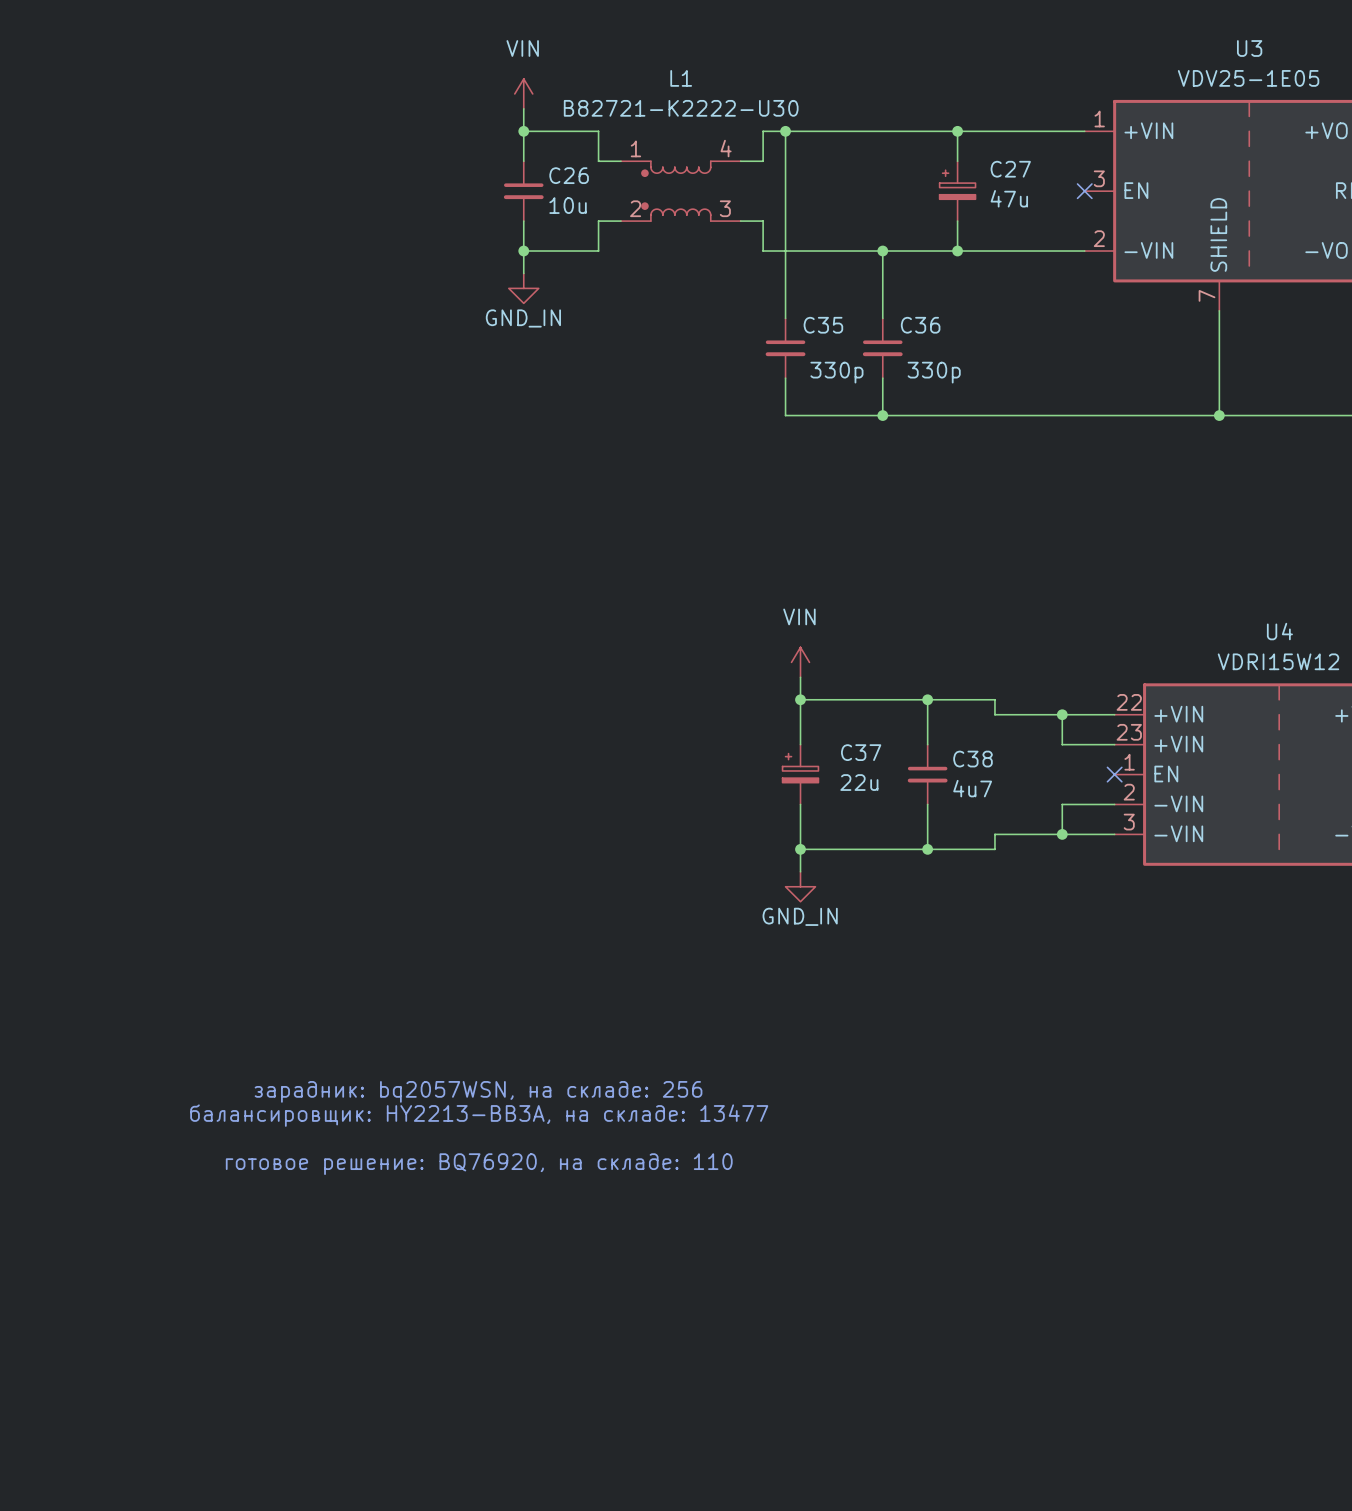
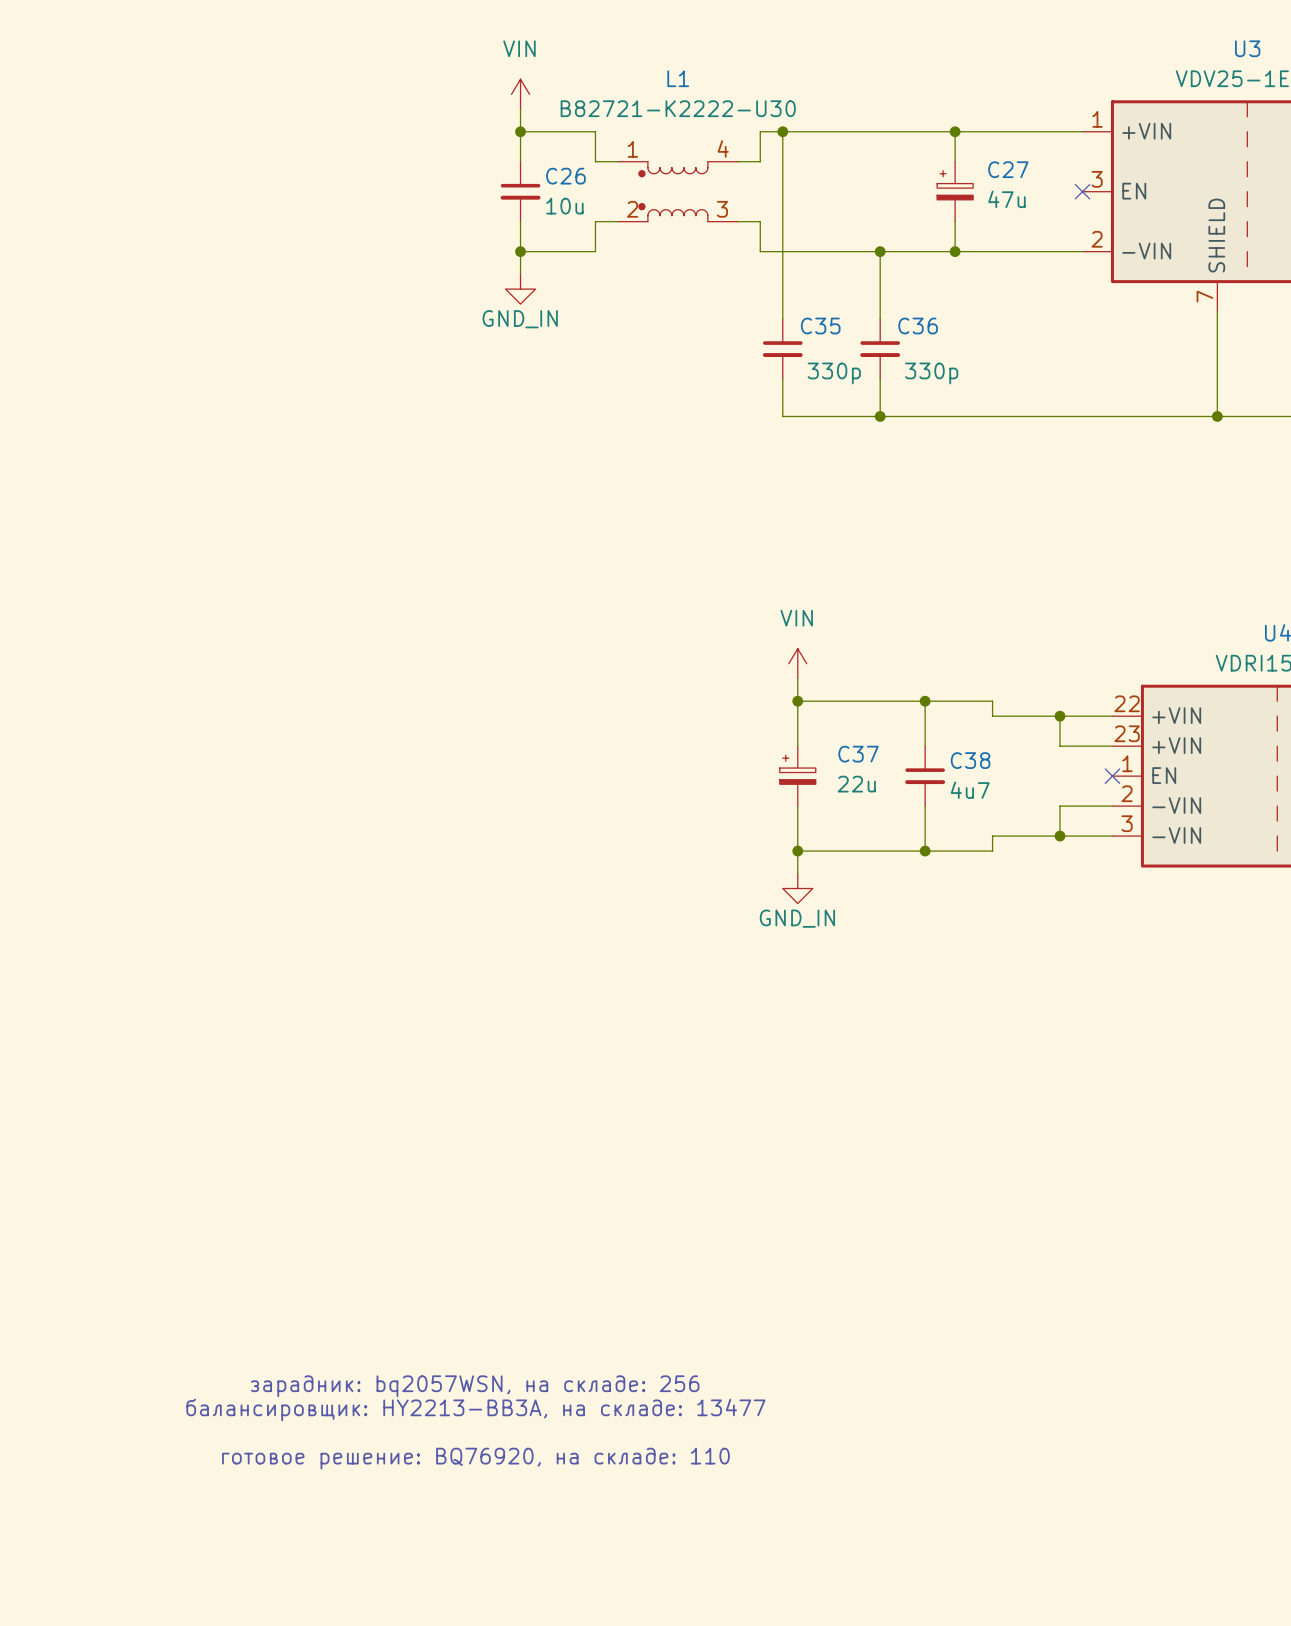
text position: зарадник: bq2057WSN, на складе: 256 (478, 1091) -> зарадник: bq2057WSN, на складе: 256 (475, 1386)
text position: балансировщик: HY2213-BB3A, на складе: 13477 (479, 1115) -> балансировщик: HY2213-BB3A, на складе: 13477 (475, 1409)
text position: готовое решение: BQ76920, на складе: 110 (479, 1164) -> готовое решение: BQ76920, на складе: 110 (475, 1458)

